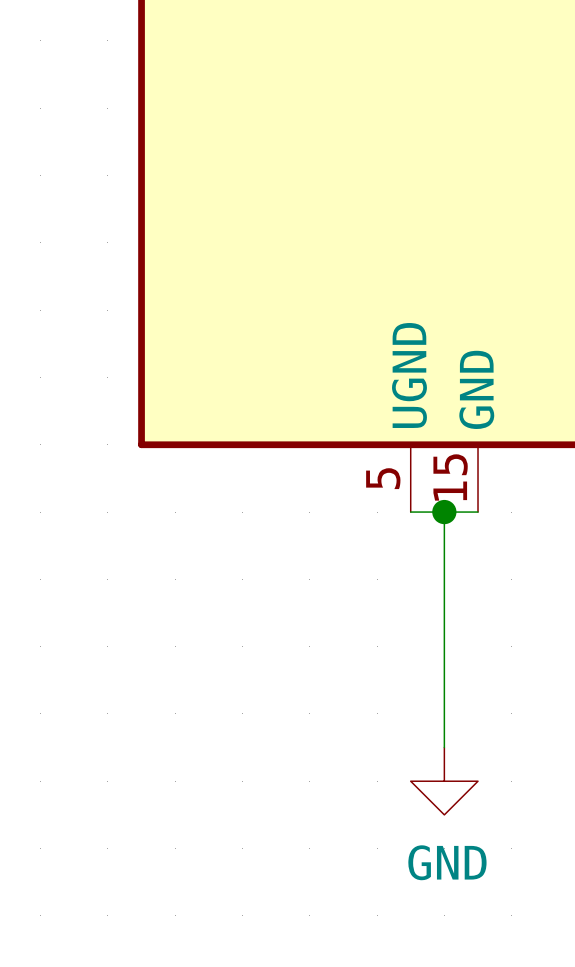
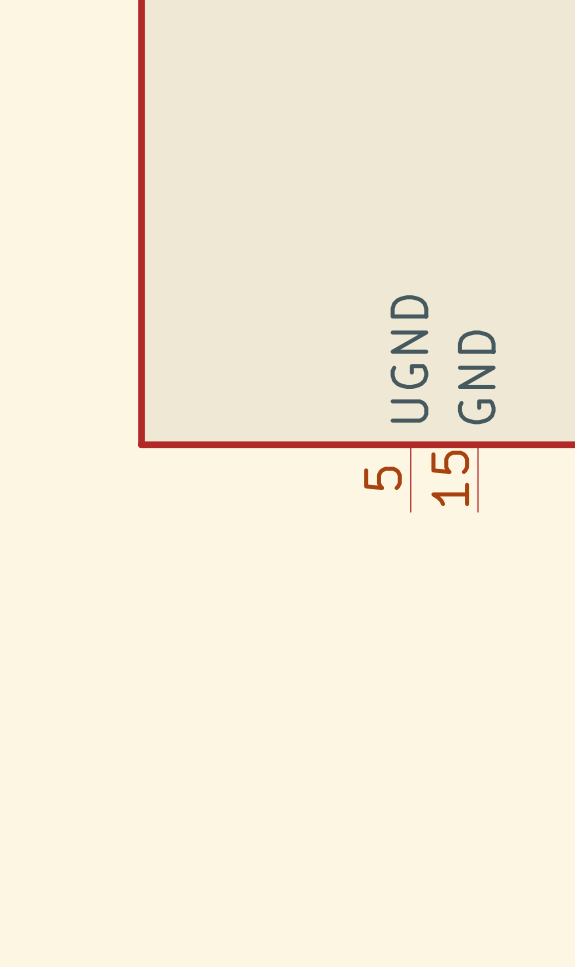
wire: (410, 512) (478, 512) -> none
wire: (444, 512) (444, 747) -> none
junction: (444, 512) -> none
power symbol: GND (444, 781) -> none

